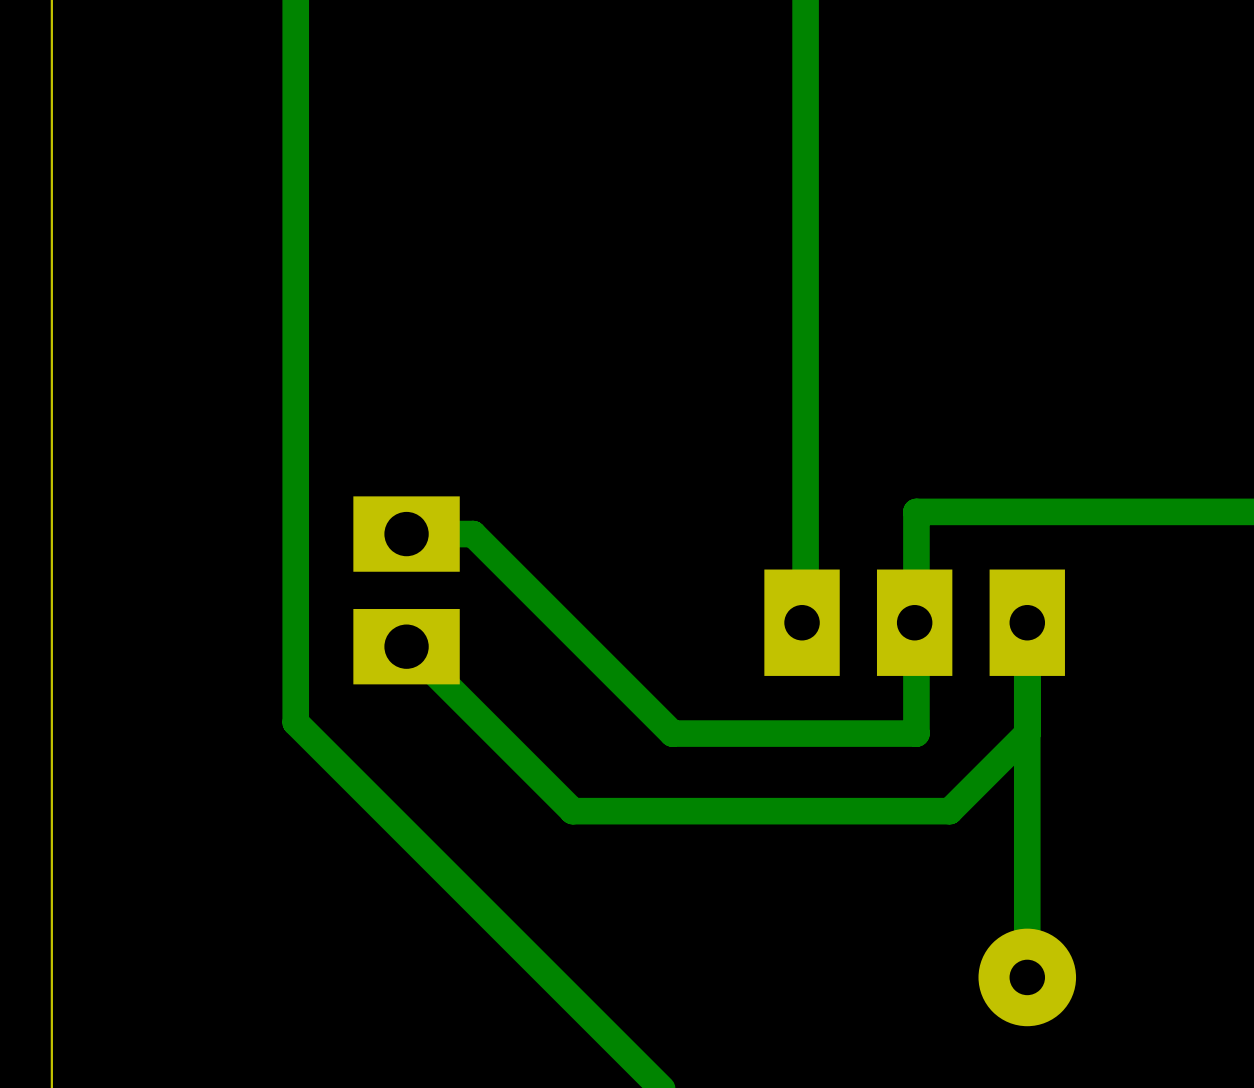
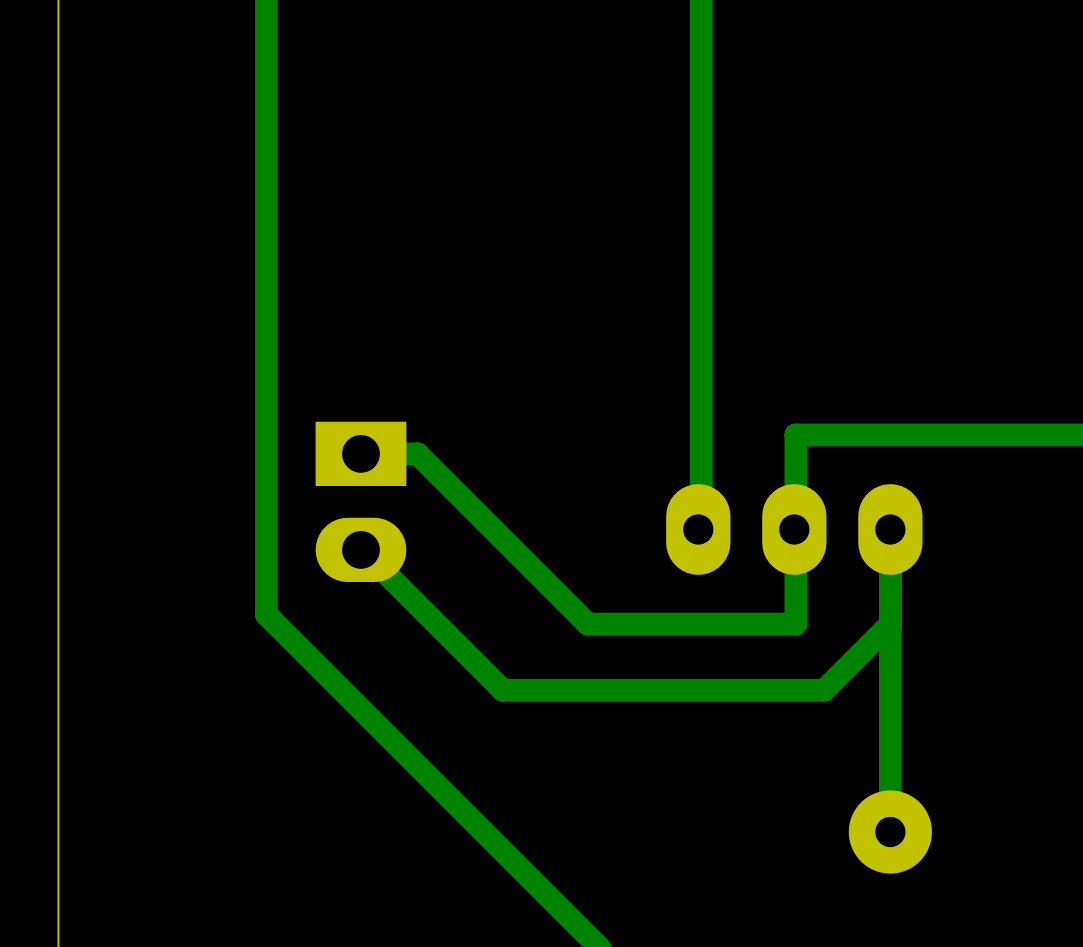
part footprint: [353, 496, 460, 685] -> [315, 421, 407, 583]
part footprint: [764, 569, 1065, 676] -> [666, 484, 923, 575]

